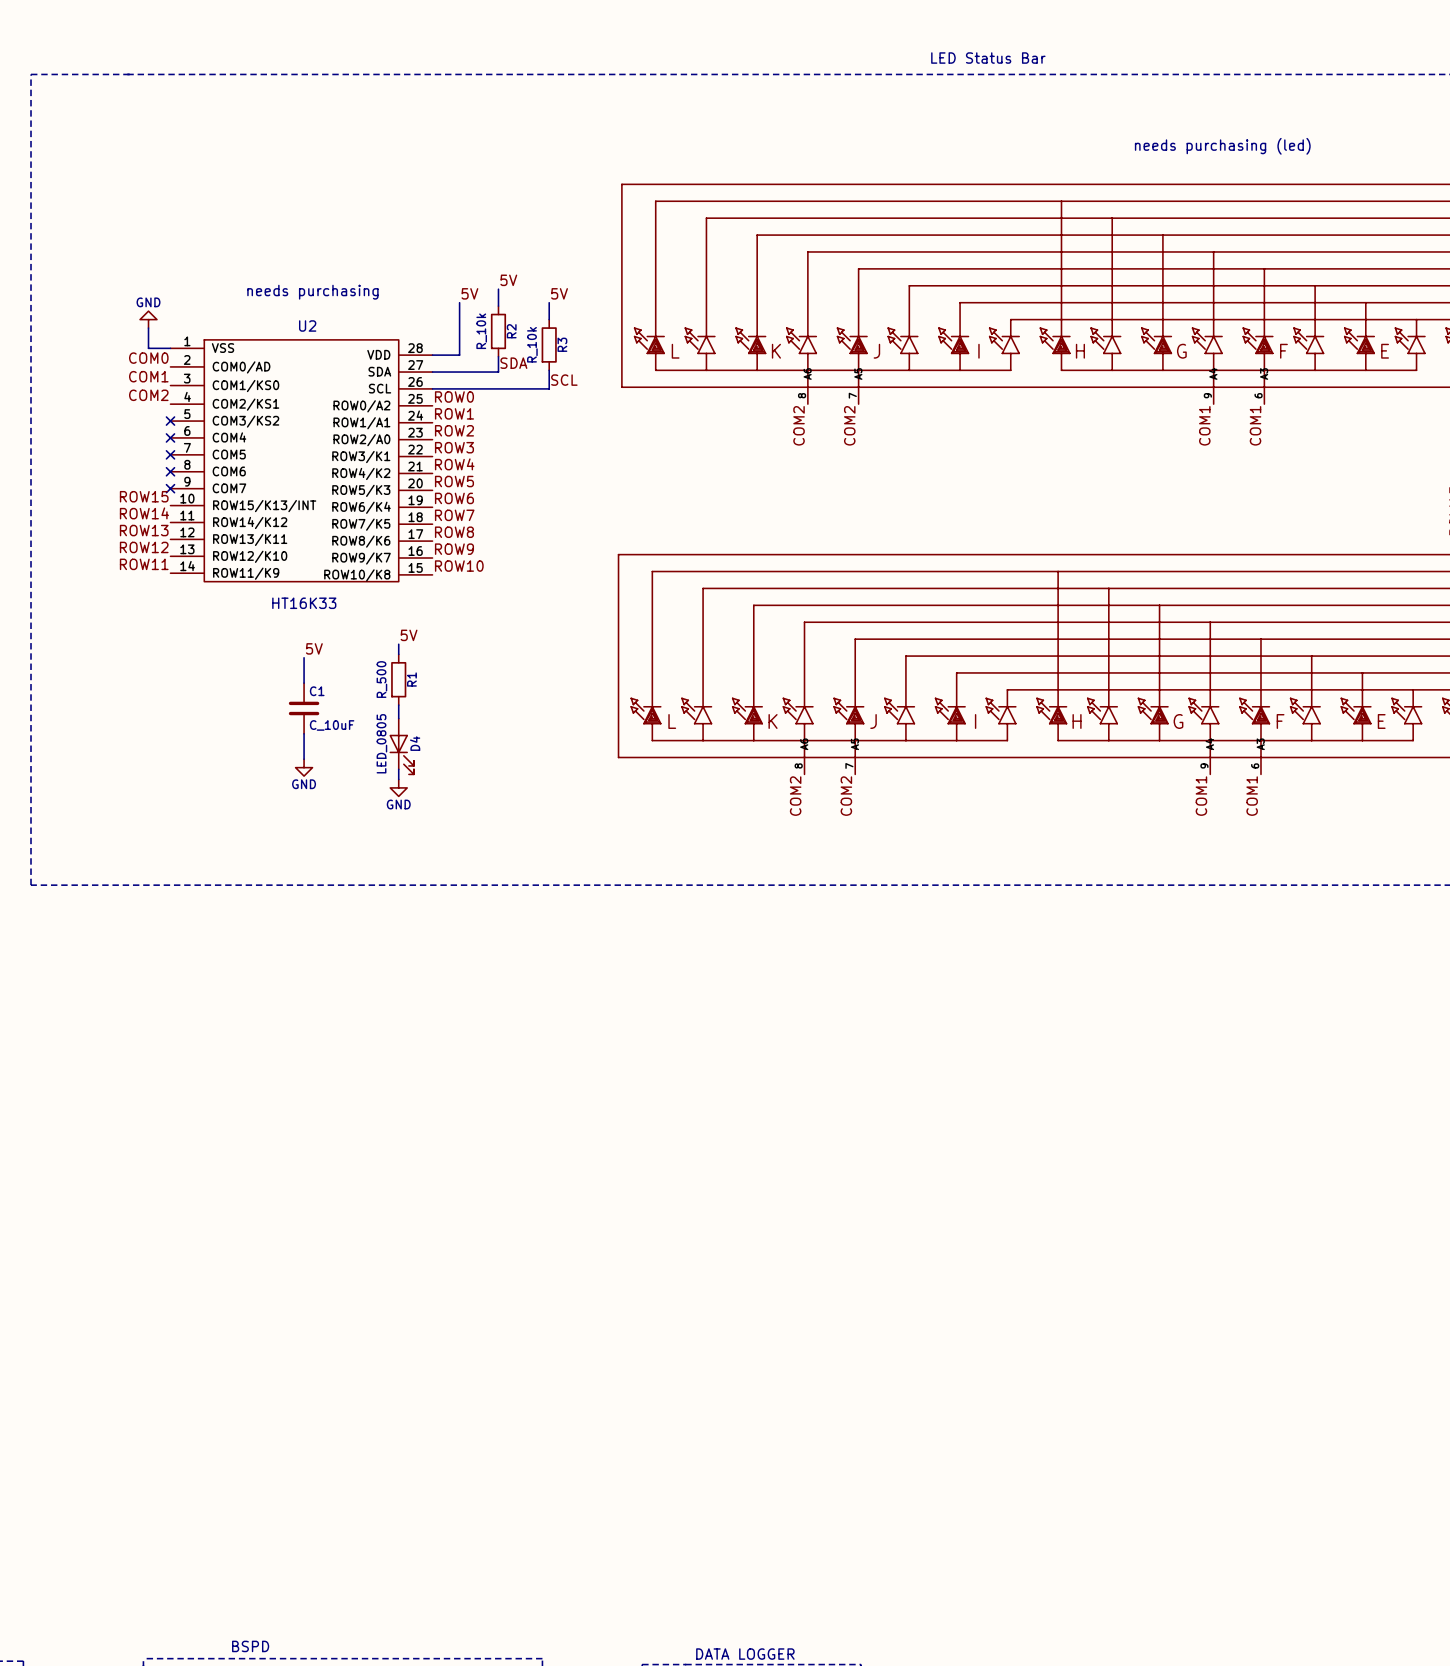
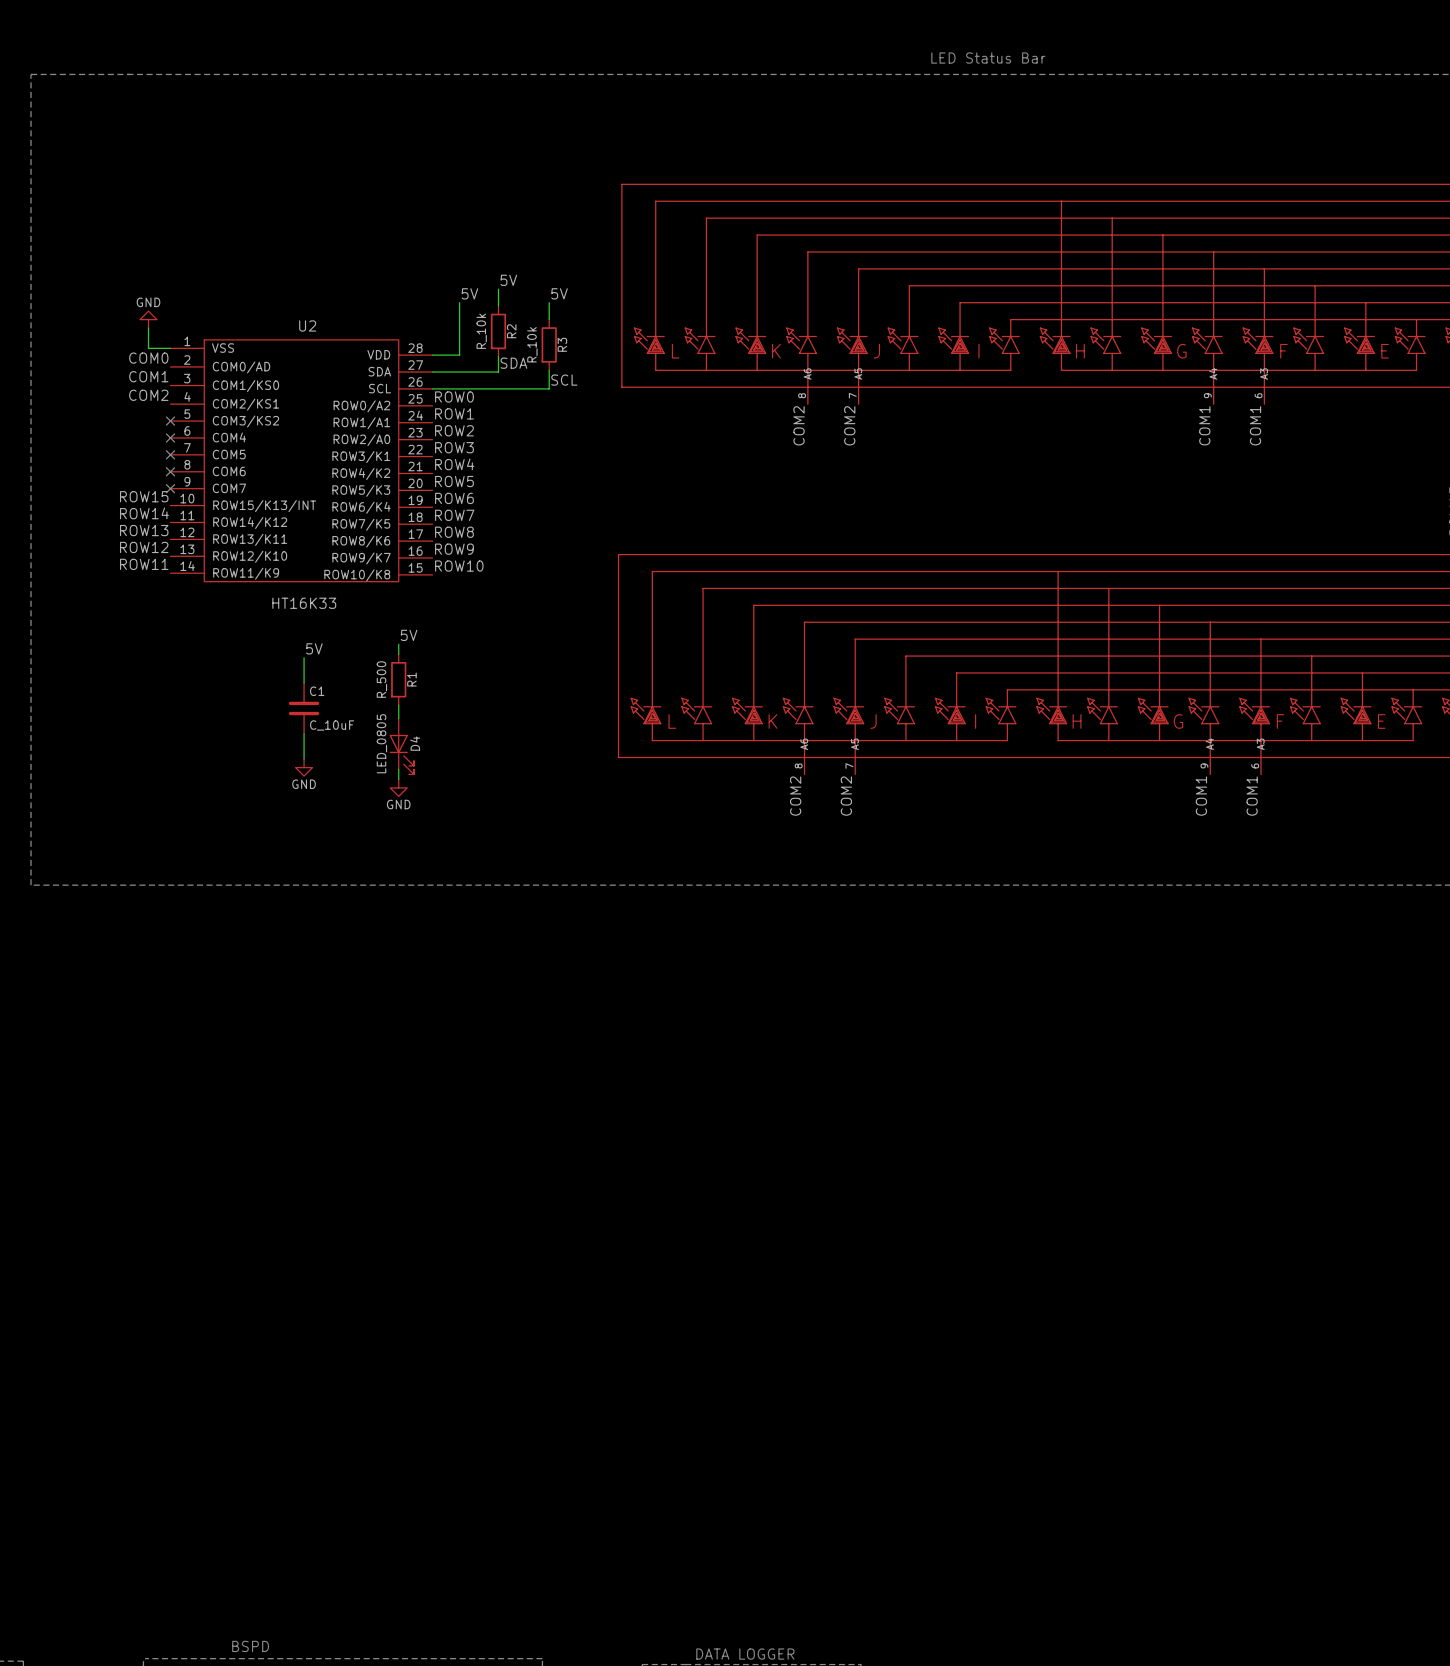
text: needs purchasing (led) (1222, 146) -> none
text: needs purchasing (312, 292) -> none

